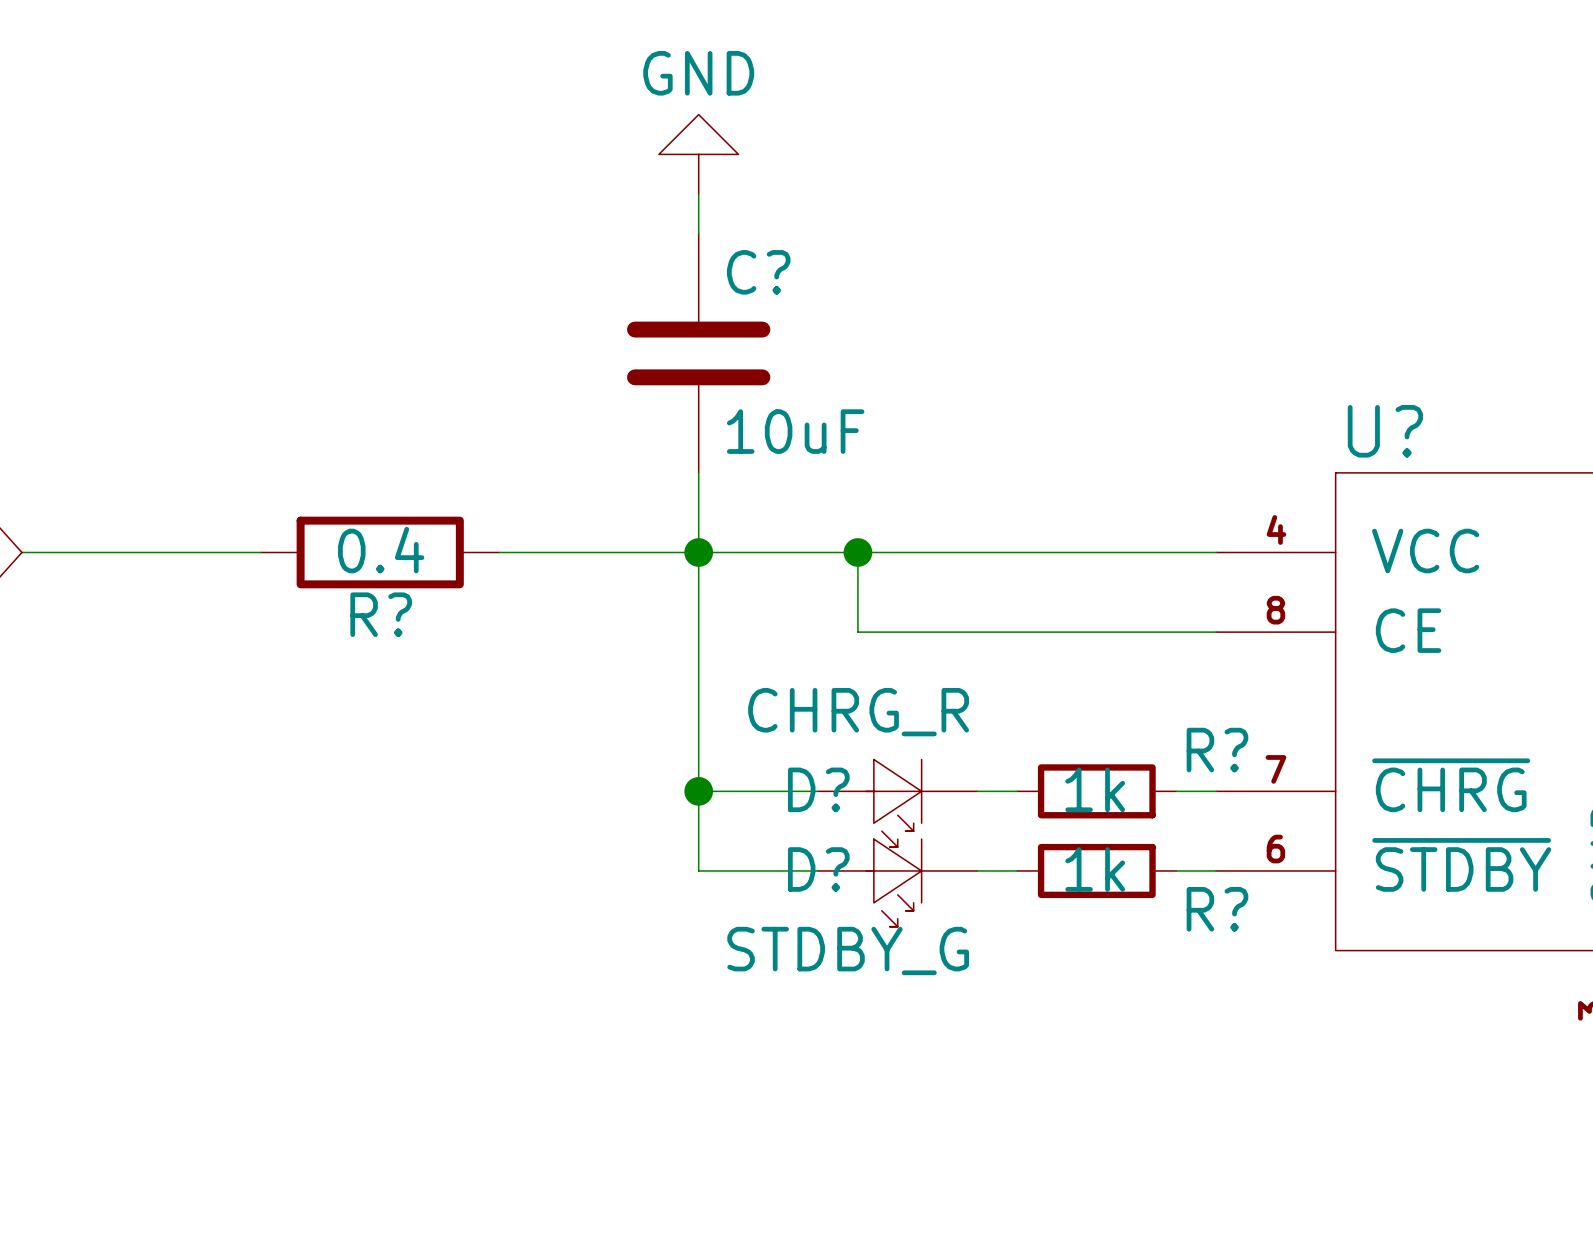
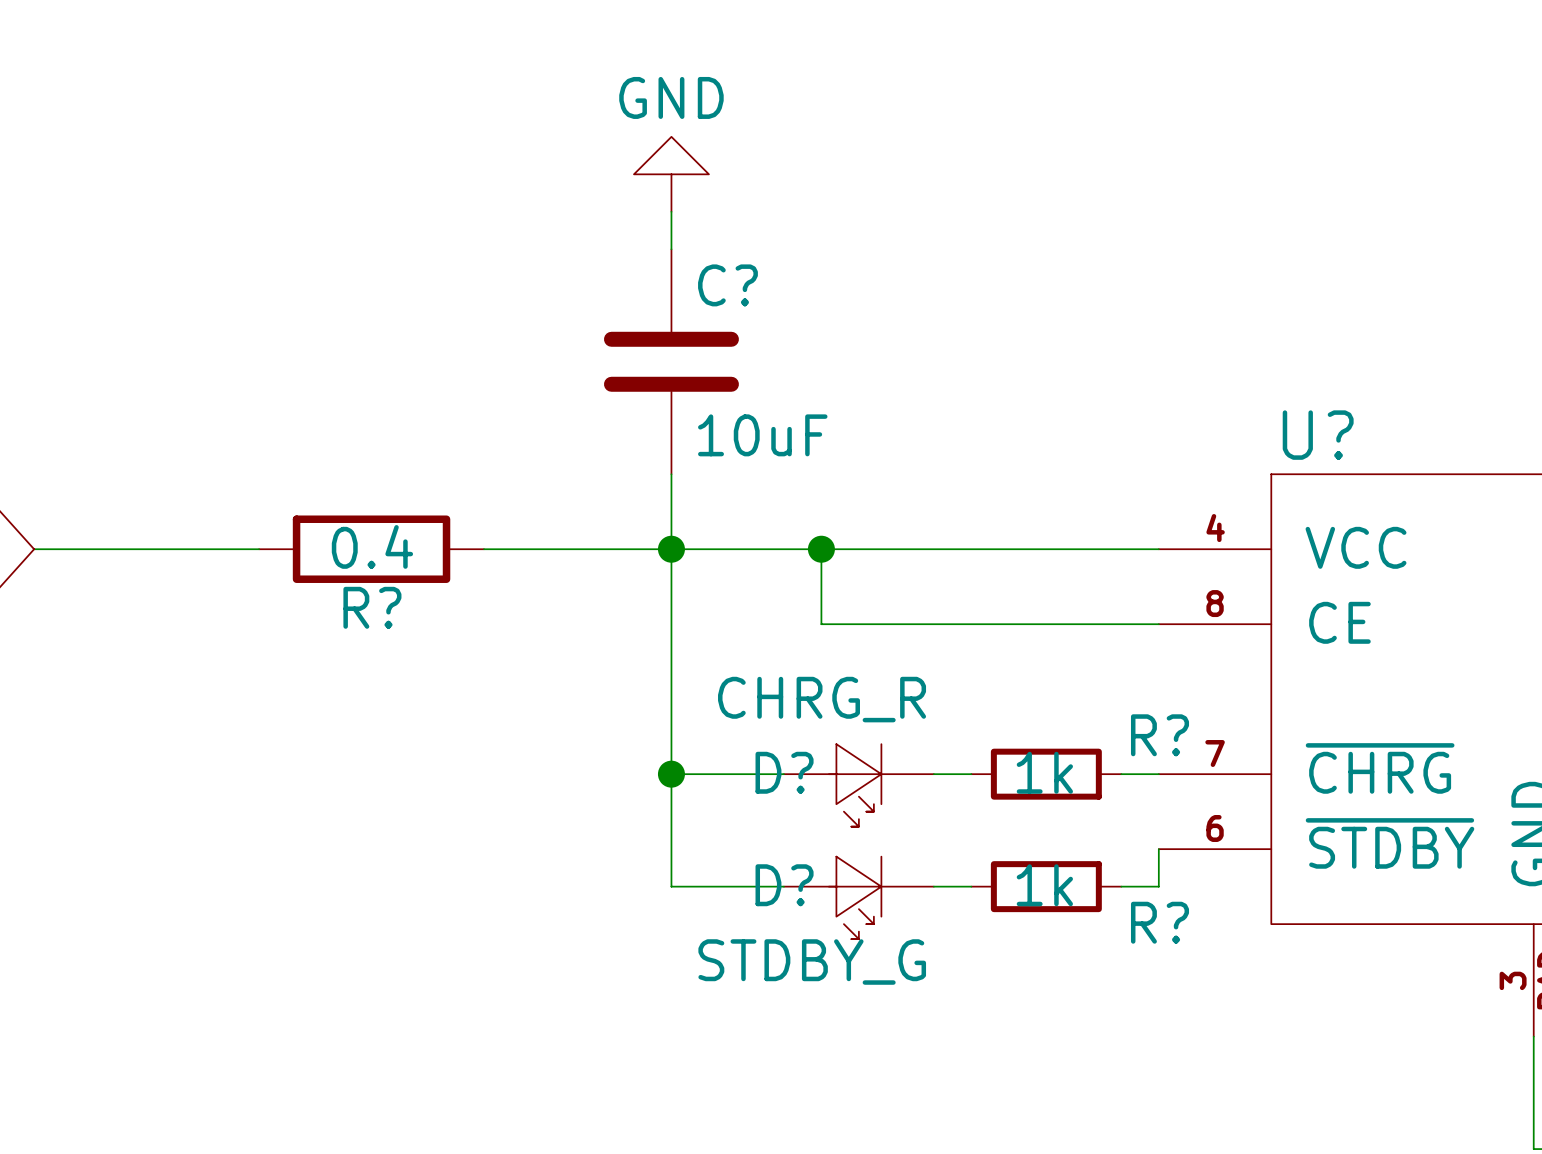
wire: (698, 870) (818, 870) -> (671, 849) (671, 886) (783, 886)
wire: (977, 870) (1017, 870) -> (933, 886) (971, 886)
R? position: (1096, 870) -> (1046, 886)
wire: (1176, 870) (1216, 870) -> (1121, 886) (1158, 886) (1158, 849)
D? position: (897, 882) -> (858, 897)

